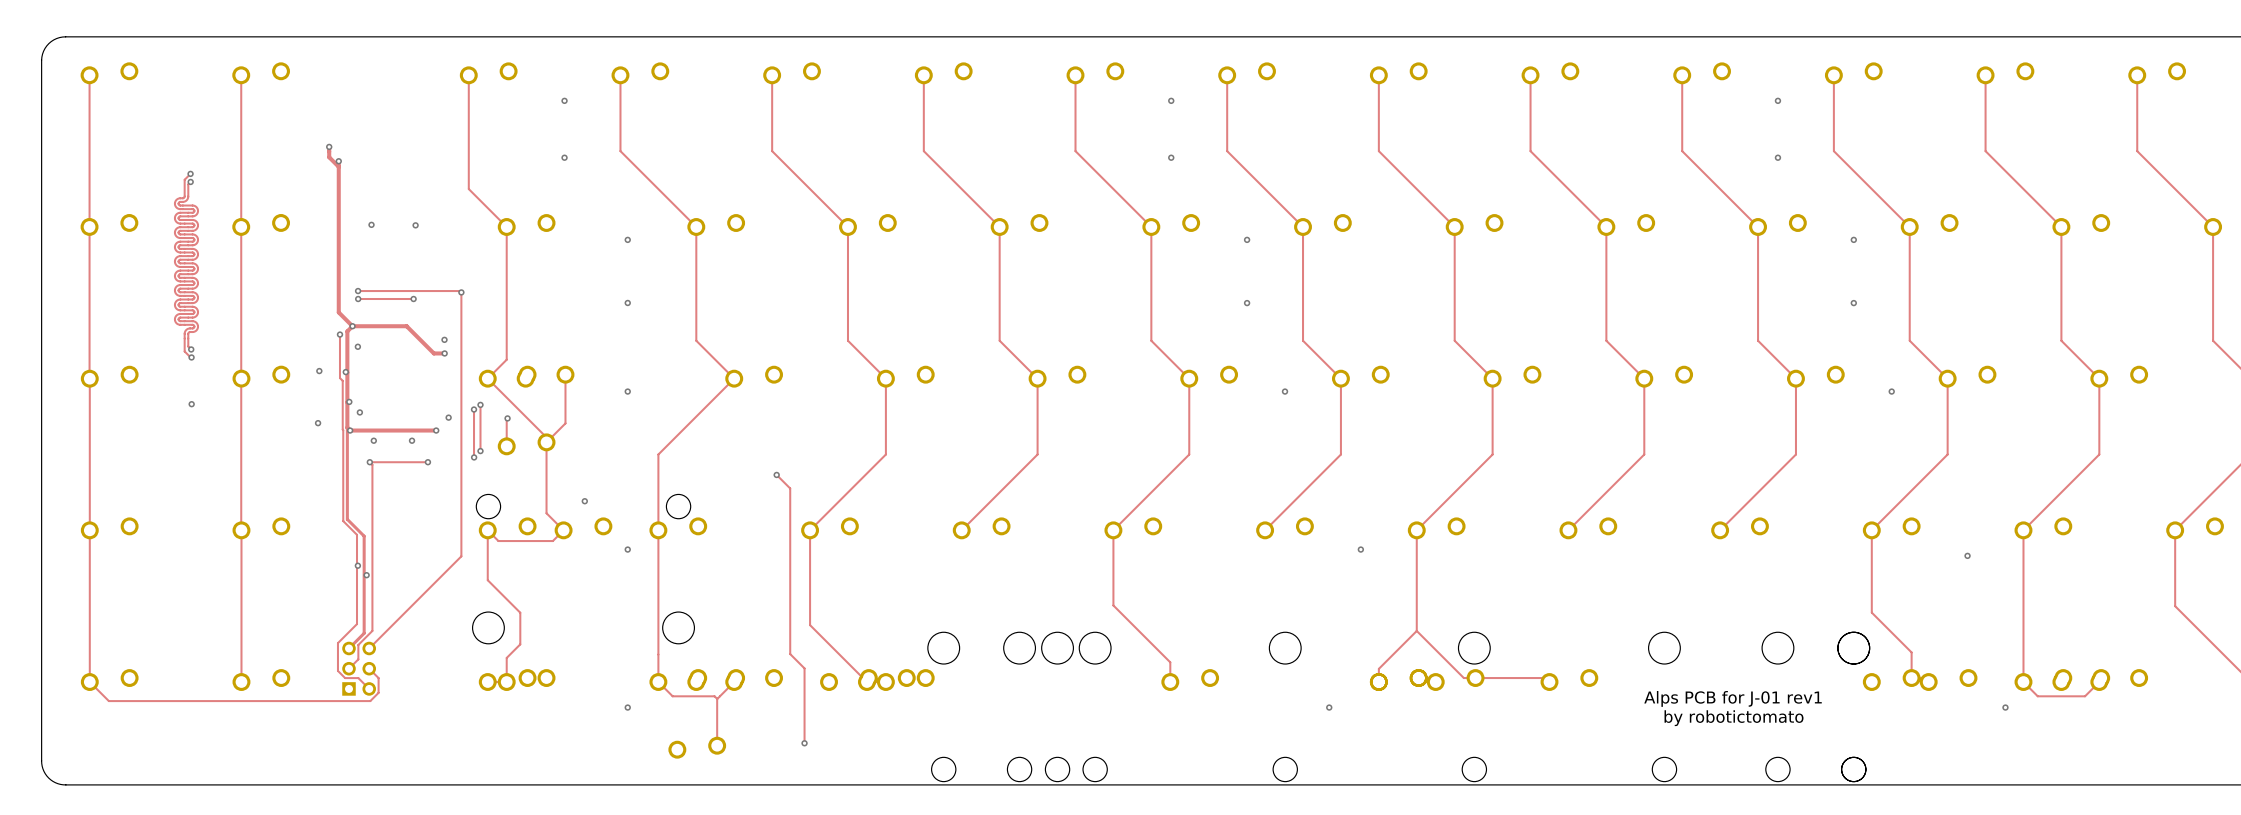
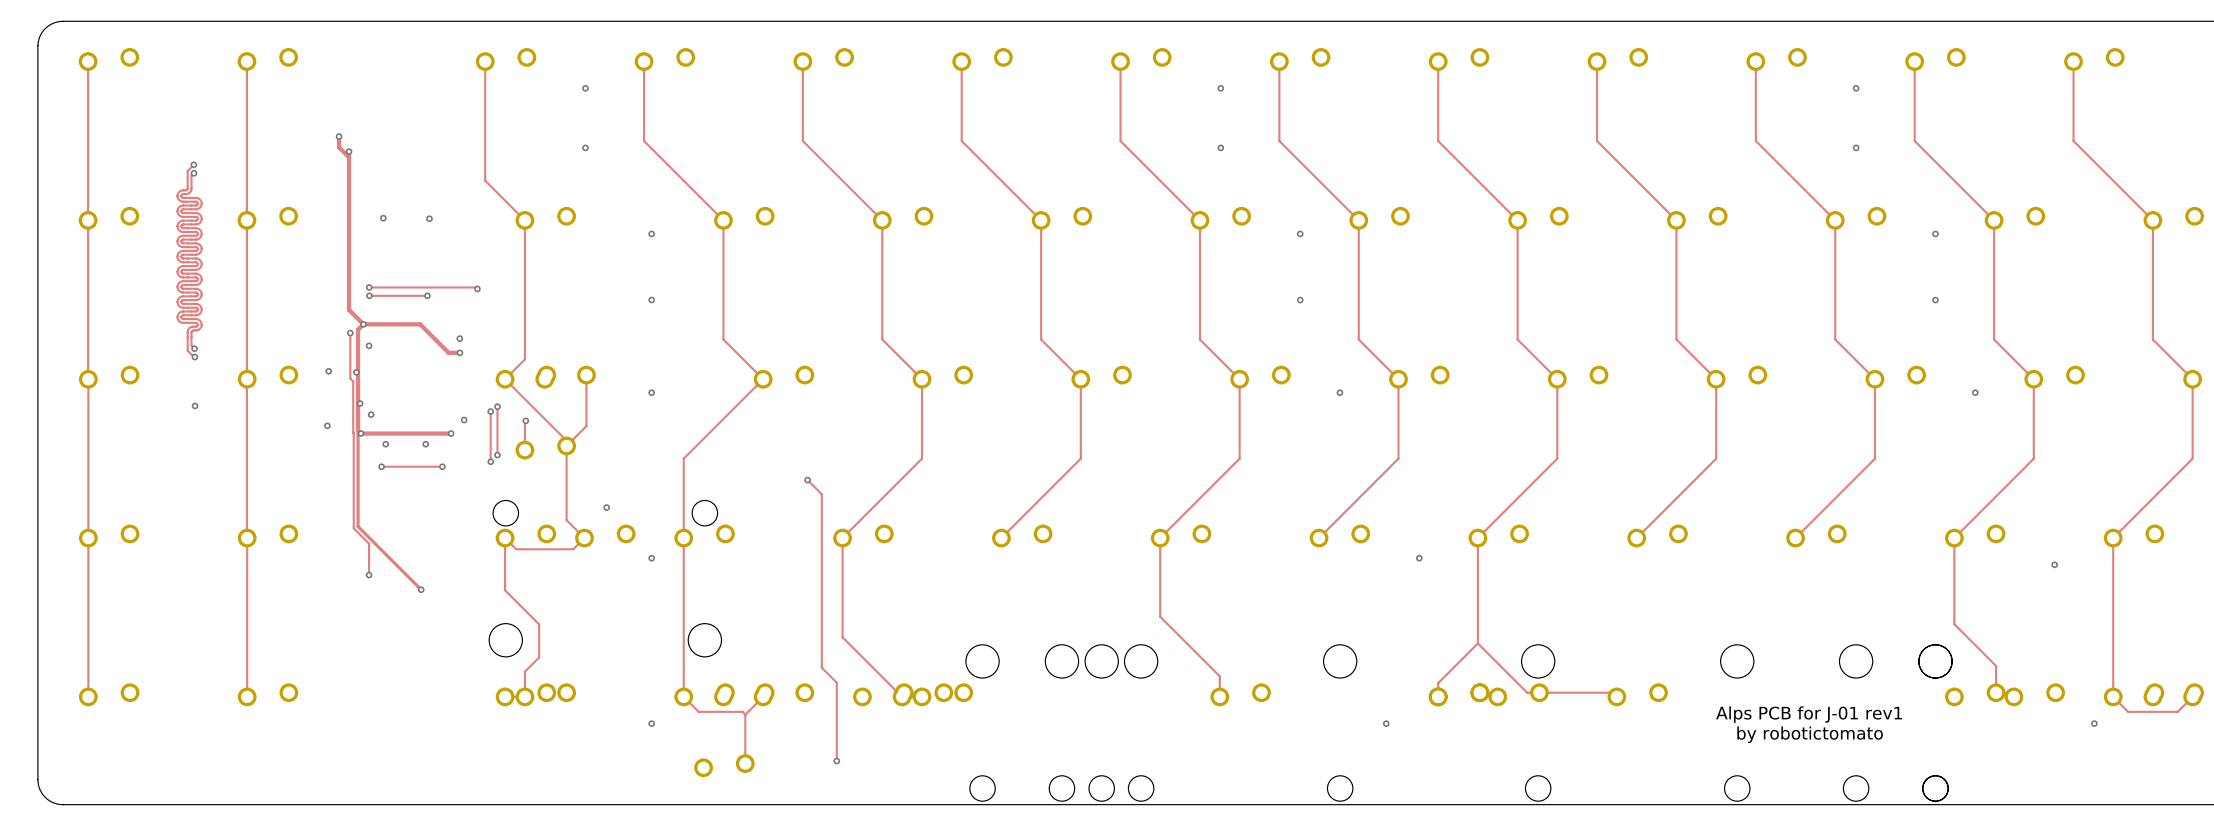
track: (461, 292) (461, 556) (369, 648) -> none
track: (369, 462) (372, 464) (372, 630) (358, 644) (358, 659) (349, 668) -> none
track: (357, 534) (357, 624) (337, 643) (337, 670) (345, 678) (358, 678) (369, 688) -> (368, 542) (369, 575)
track: (364, 536) (364, 633) (349, 648) -> (375, 544) (421, 589)
via position: (366, 575) -> (421, 589)
part: (359, 668) -> none
track: (369, 668) (378, 678) (378, 692) (370, 701) (108, 701) (89, 682) -> none

